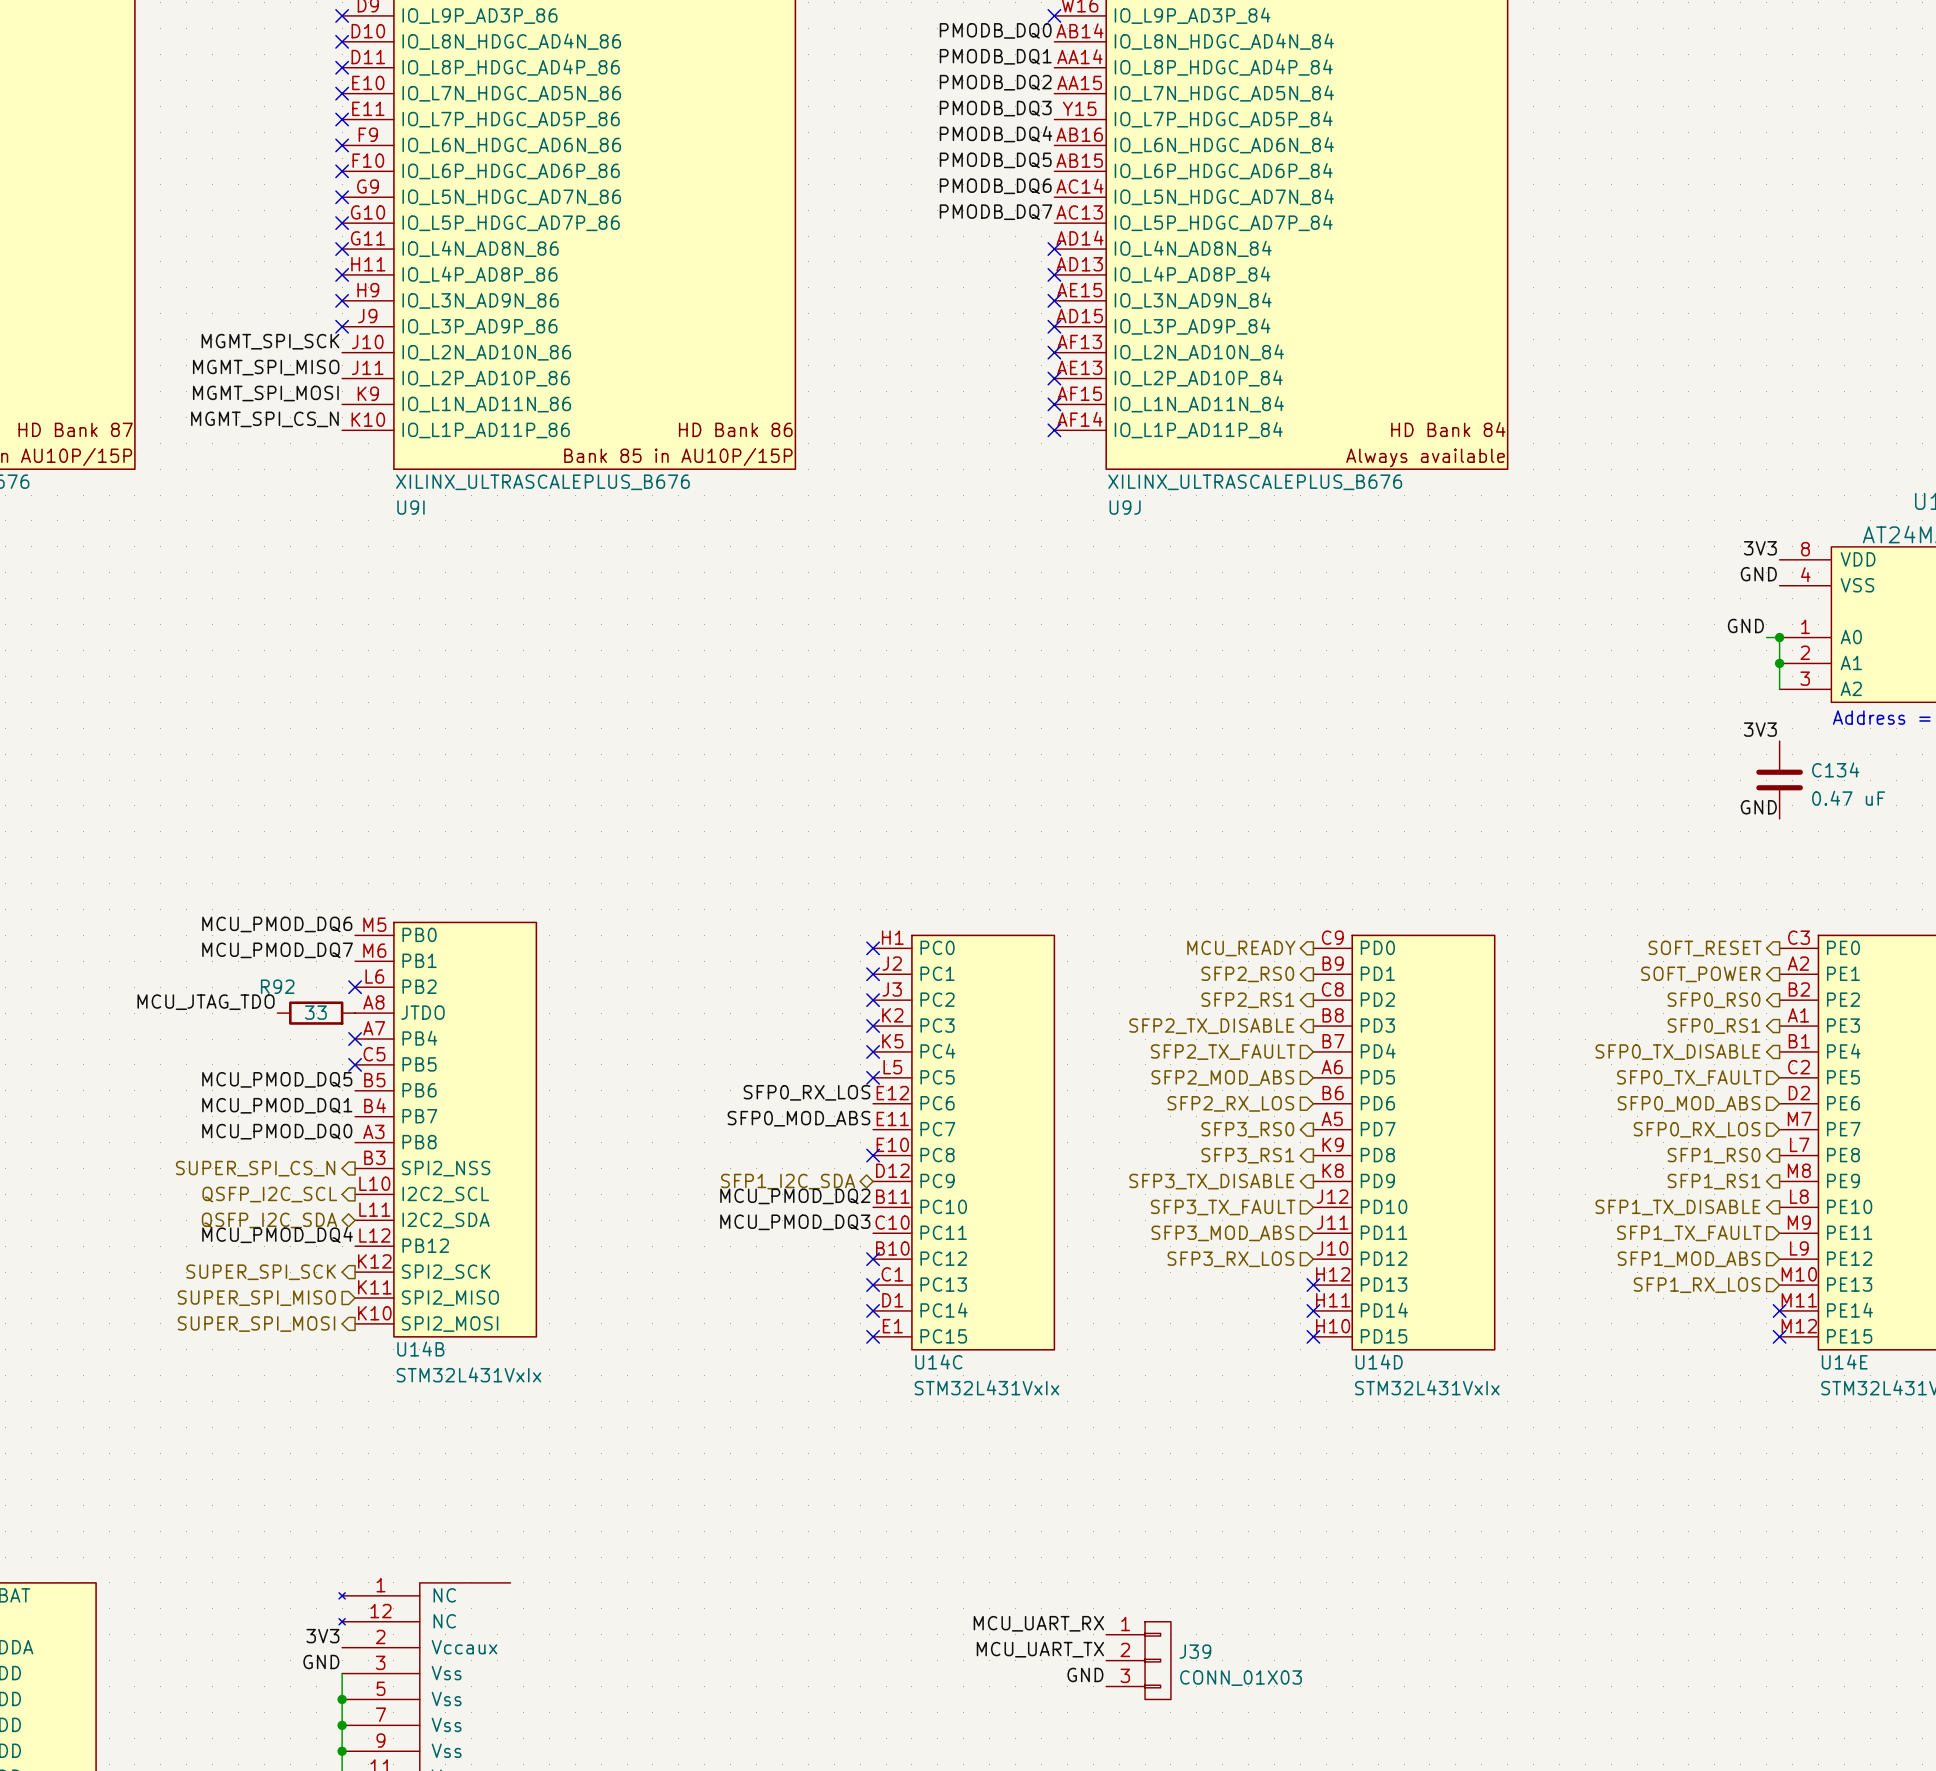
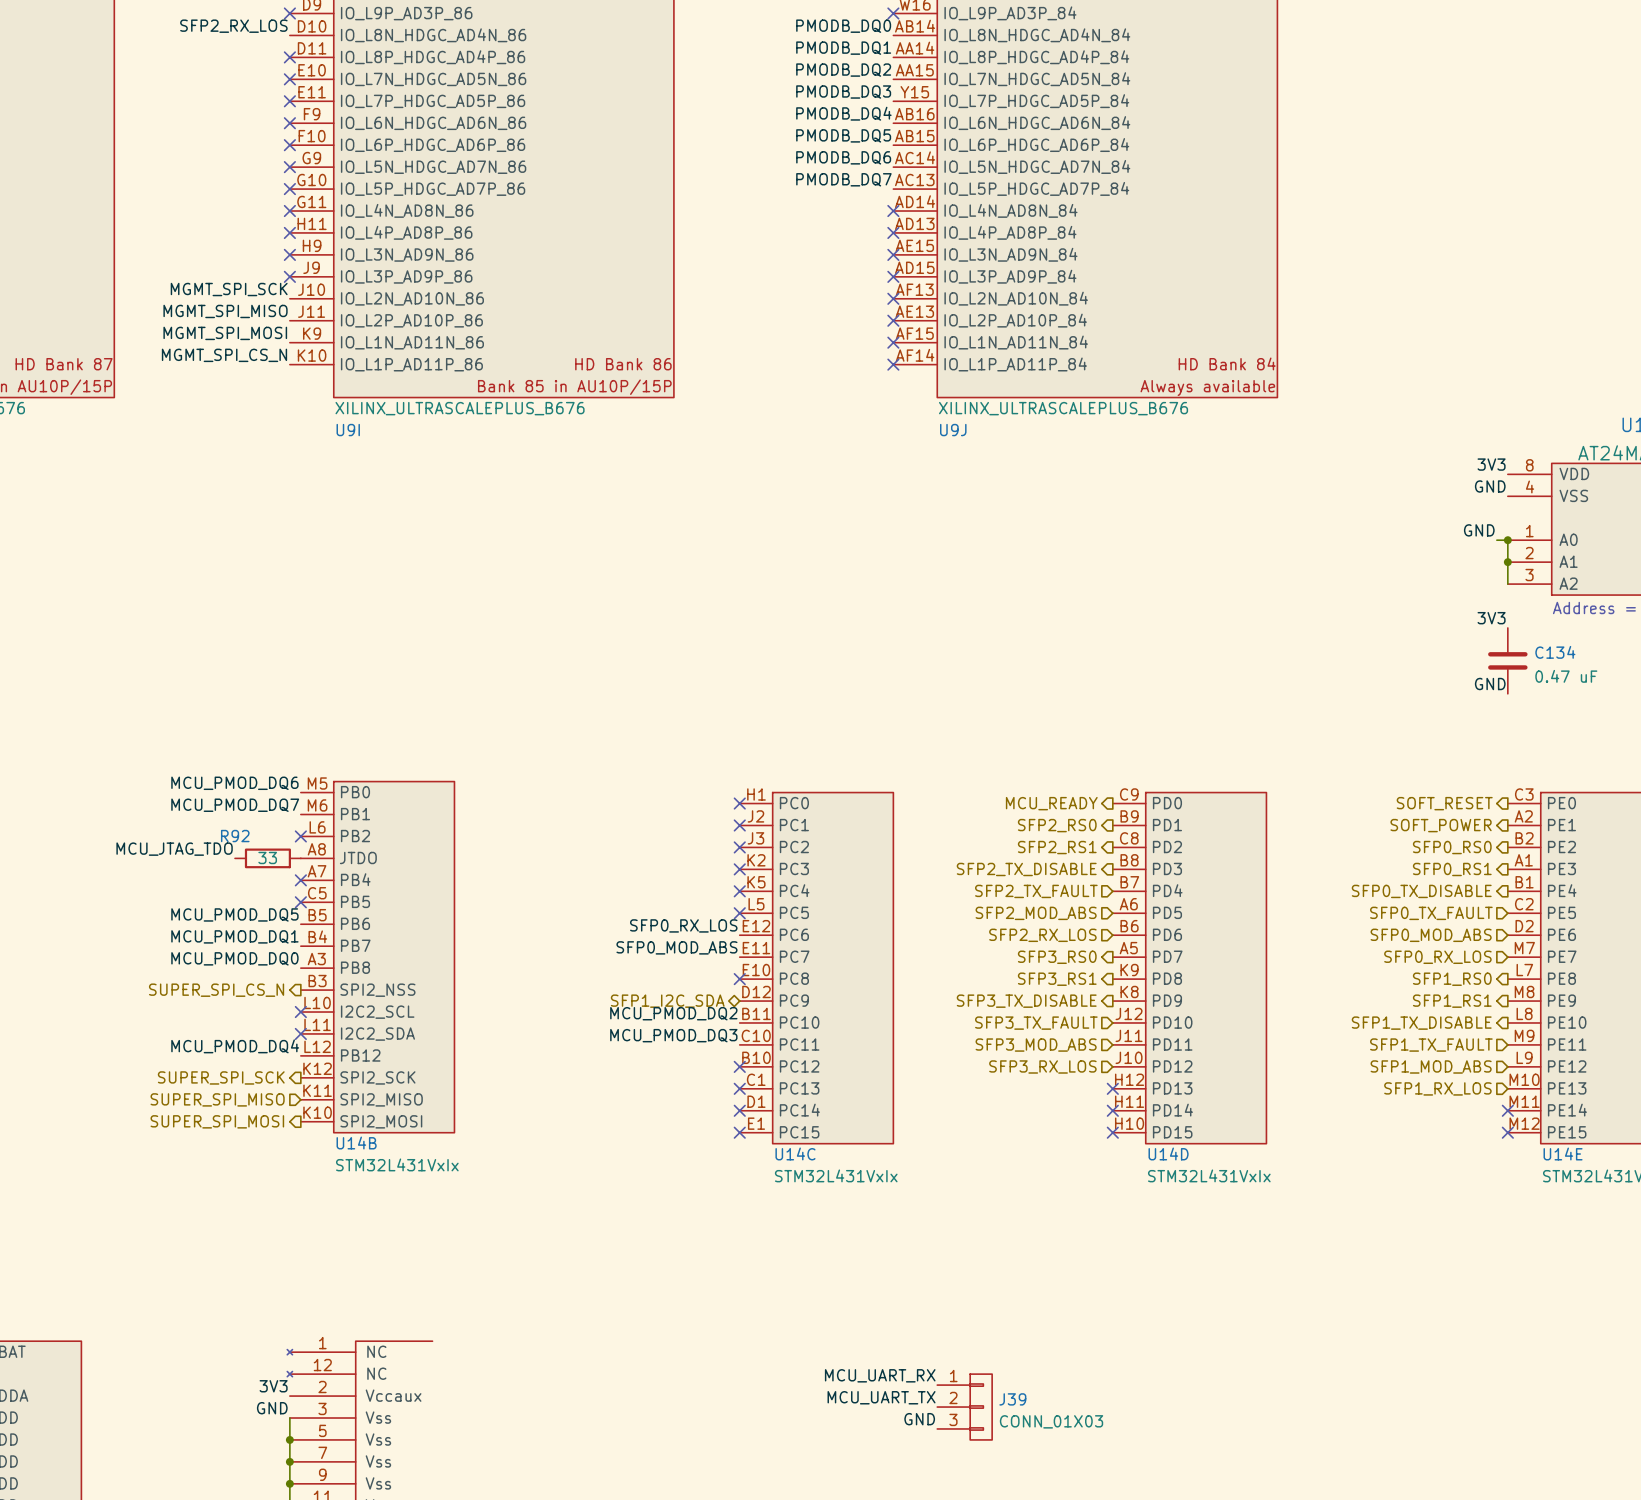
label: none -> SFP2_RX_LOS (233, 26)
no-connect mark: (342, 41) -> none
hierarchical label: QSFP_I2C_SCL (269, 1194) -> none
no-connect mark: none -> (300, 1012)
hierarchical label: QSFP_I2C_SDA (269, 1220) -> none
no-connect mark: none -> (300, 1033)

